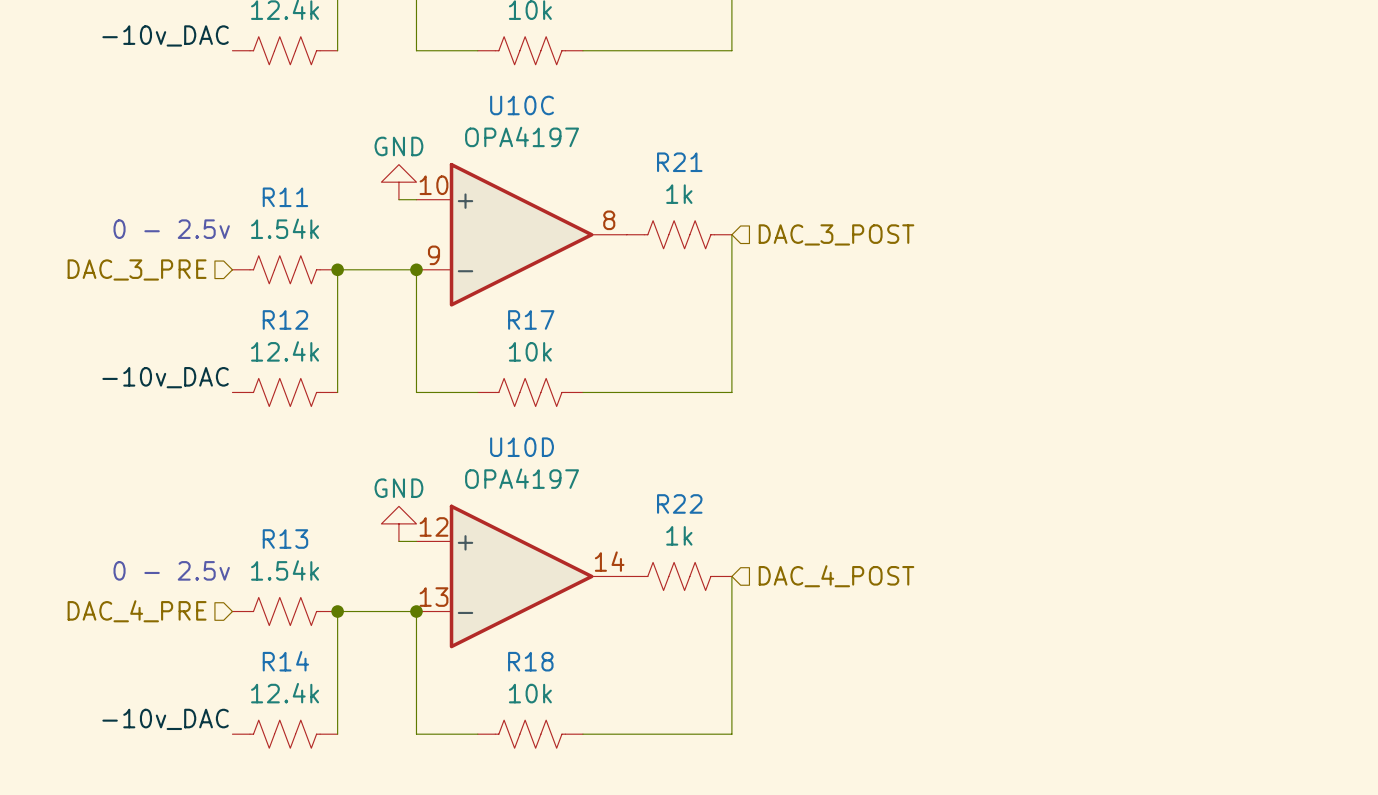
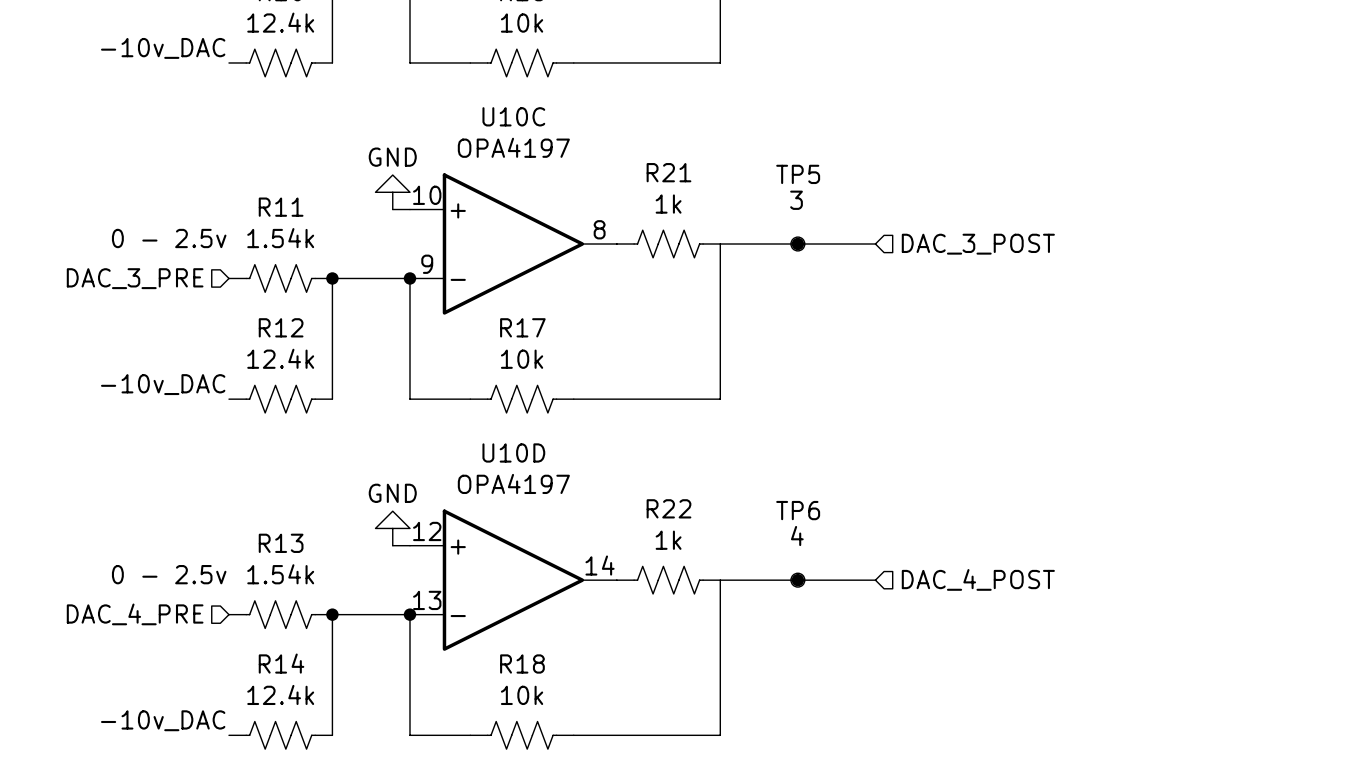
wire: none -> (720, 244) (875, 244)
TP5: none -> 3 (797, 244)
junction: none -> (797, 244)
hierarchical label position: DAC_3_POST (836, 234) -> DAC_3_POST (978, 244)
wire: none -> (720, 580) (875, 580)
TP6: none -> 4 (797, 580)
junction: none -> (797, 580)
hierarchical label position: DAC_4_POST (836, 576) -> DAC_4_POST (978, 579)

